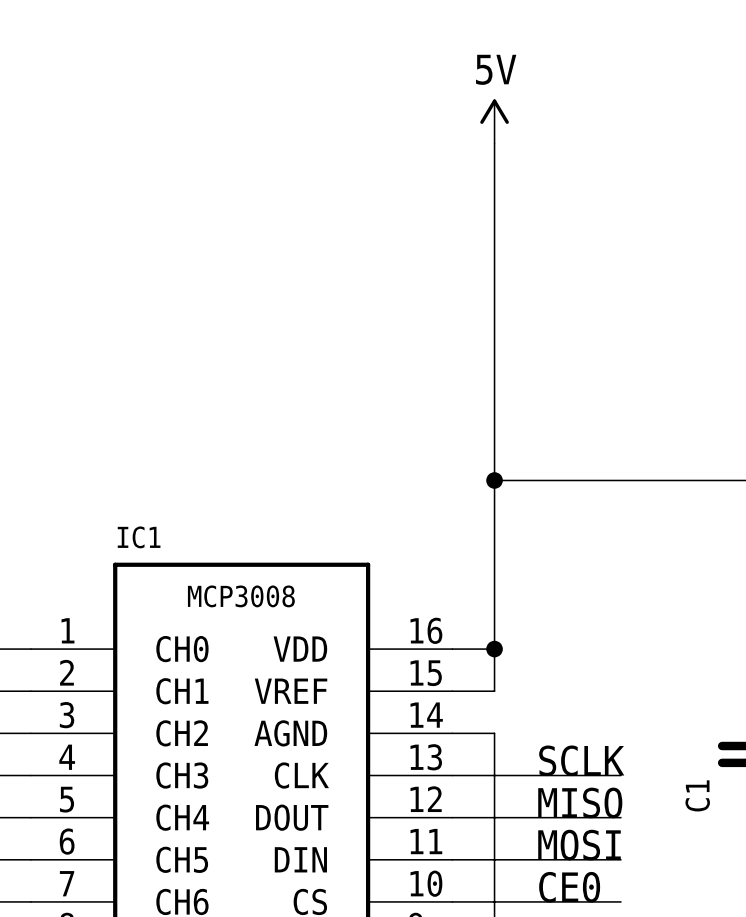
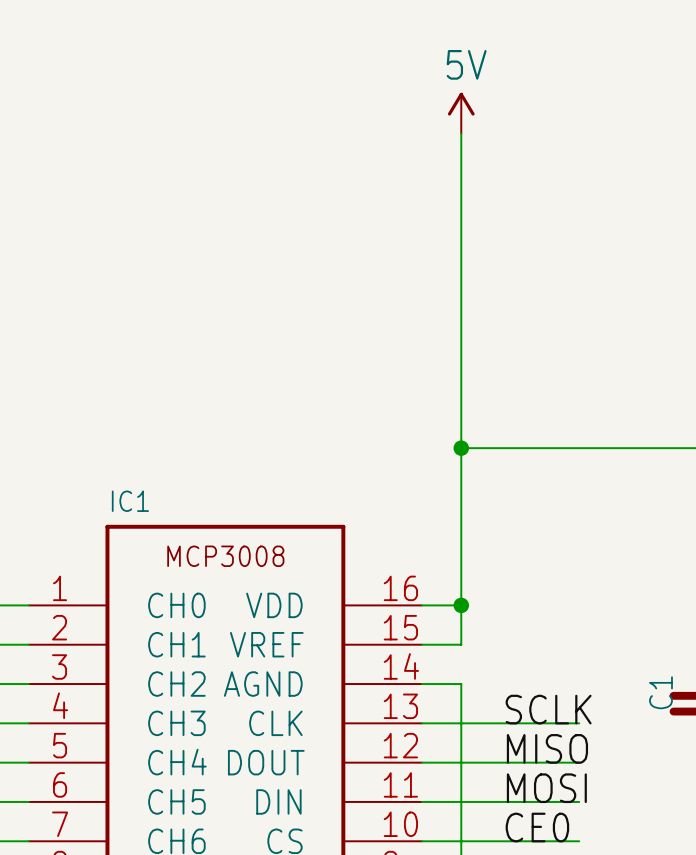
C1 name position: C1 (697, 795) -> C1 (660, 692)

